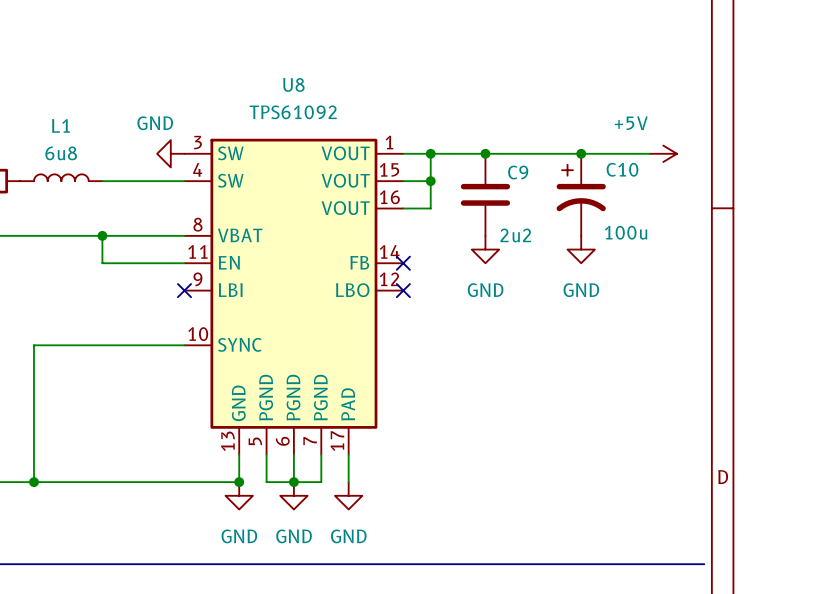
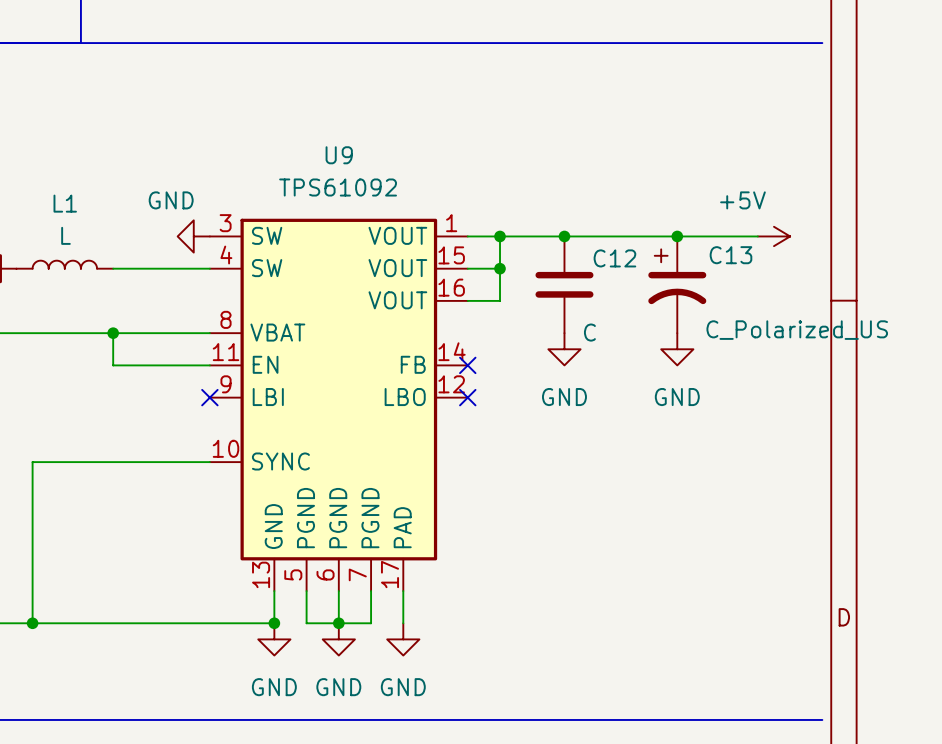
U8 name: U8 (293, 84) -> U9 (339, 155)
L1 value: 6u8 (61, 153) -> L (65, 235)
C10 name: C10 (622, 169) -> C13 (730, 255)
C9 name: C9 (518, 172) -> C12 (614, 258)
C10 value: 100u (626, 232) -> C_Polarized_US (797, 330)
C9 value: 2u2 (515, 235) -> C (589, 332)

